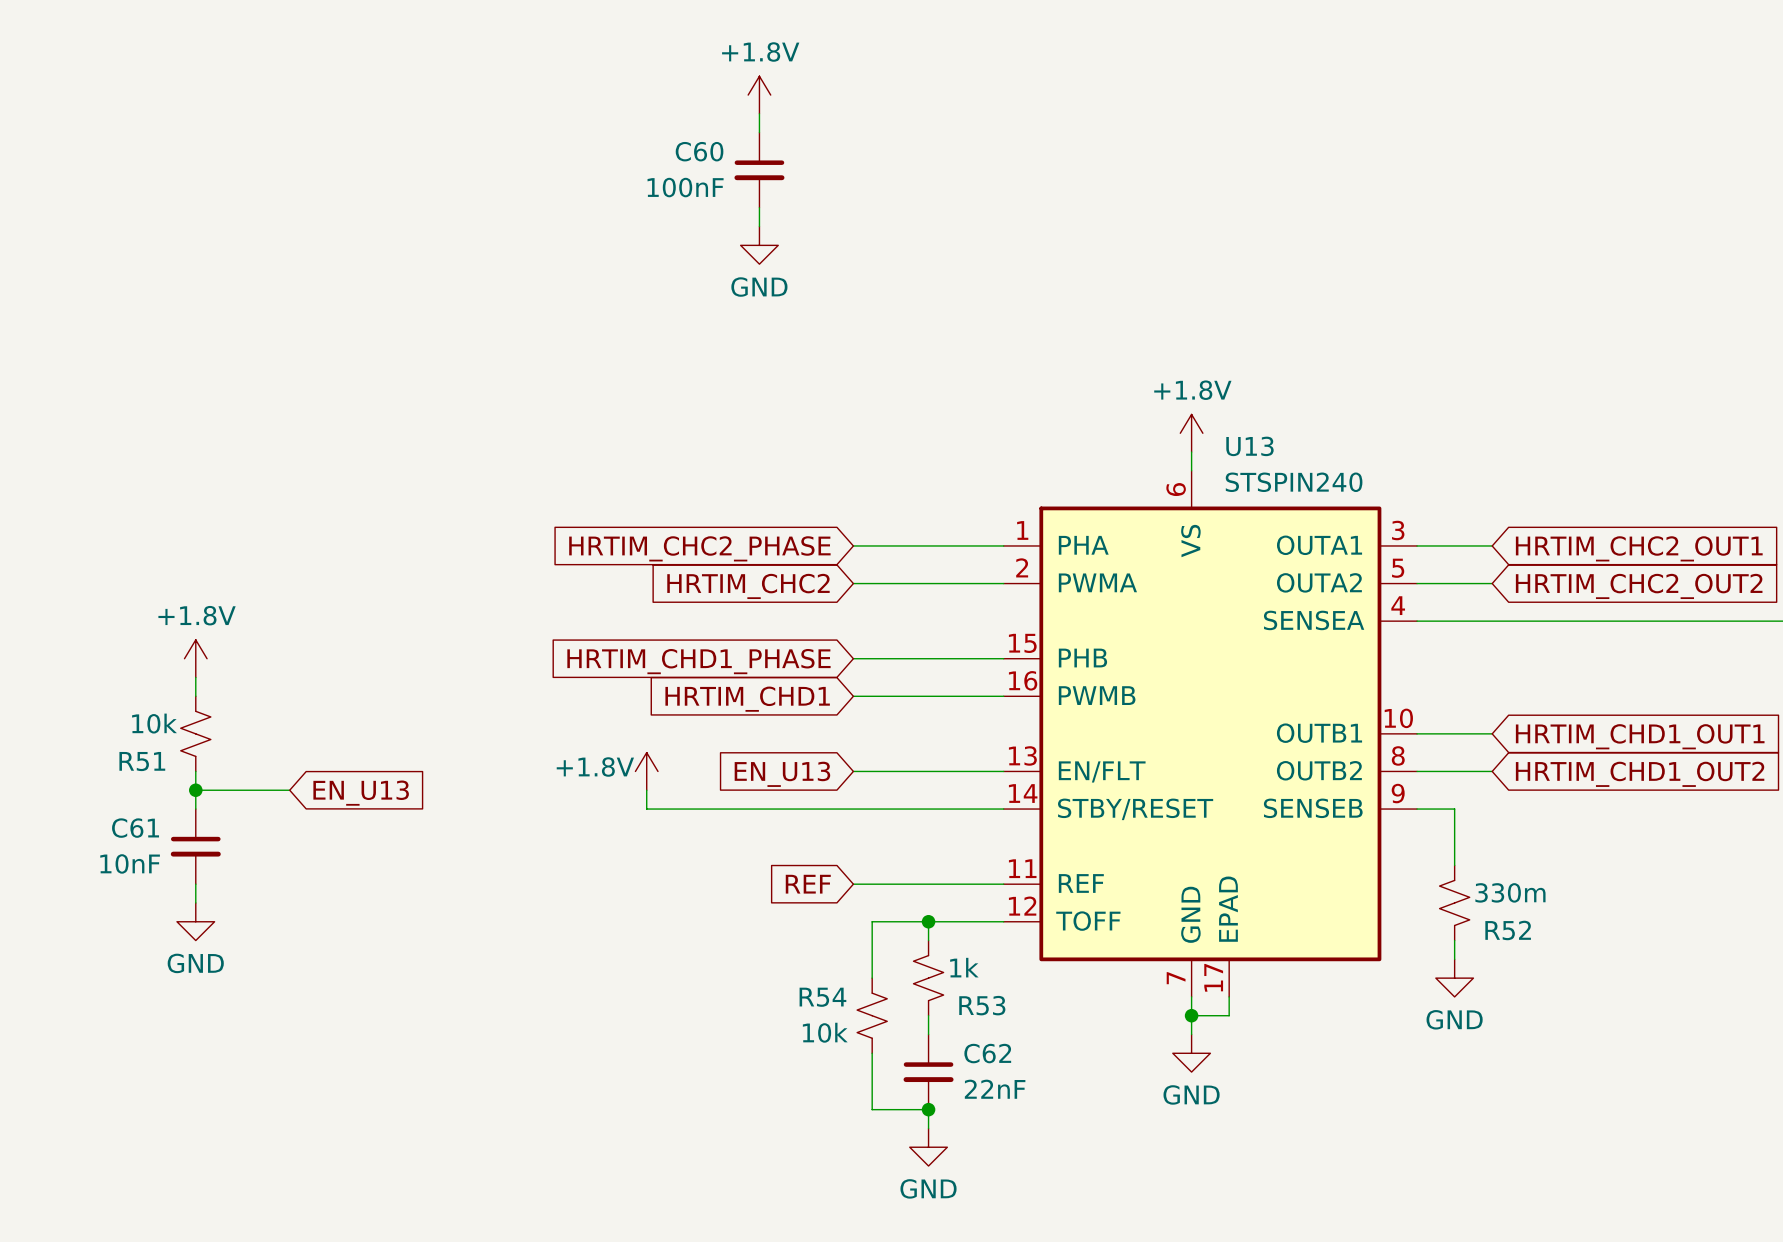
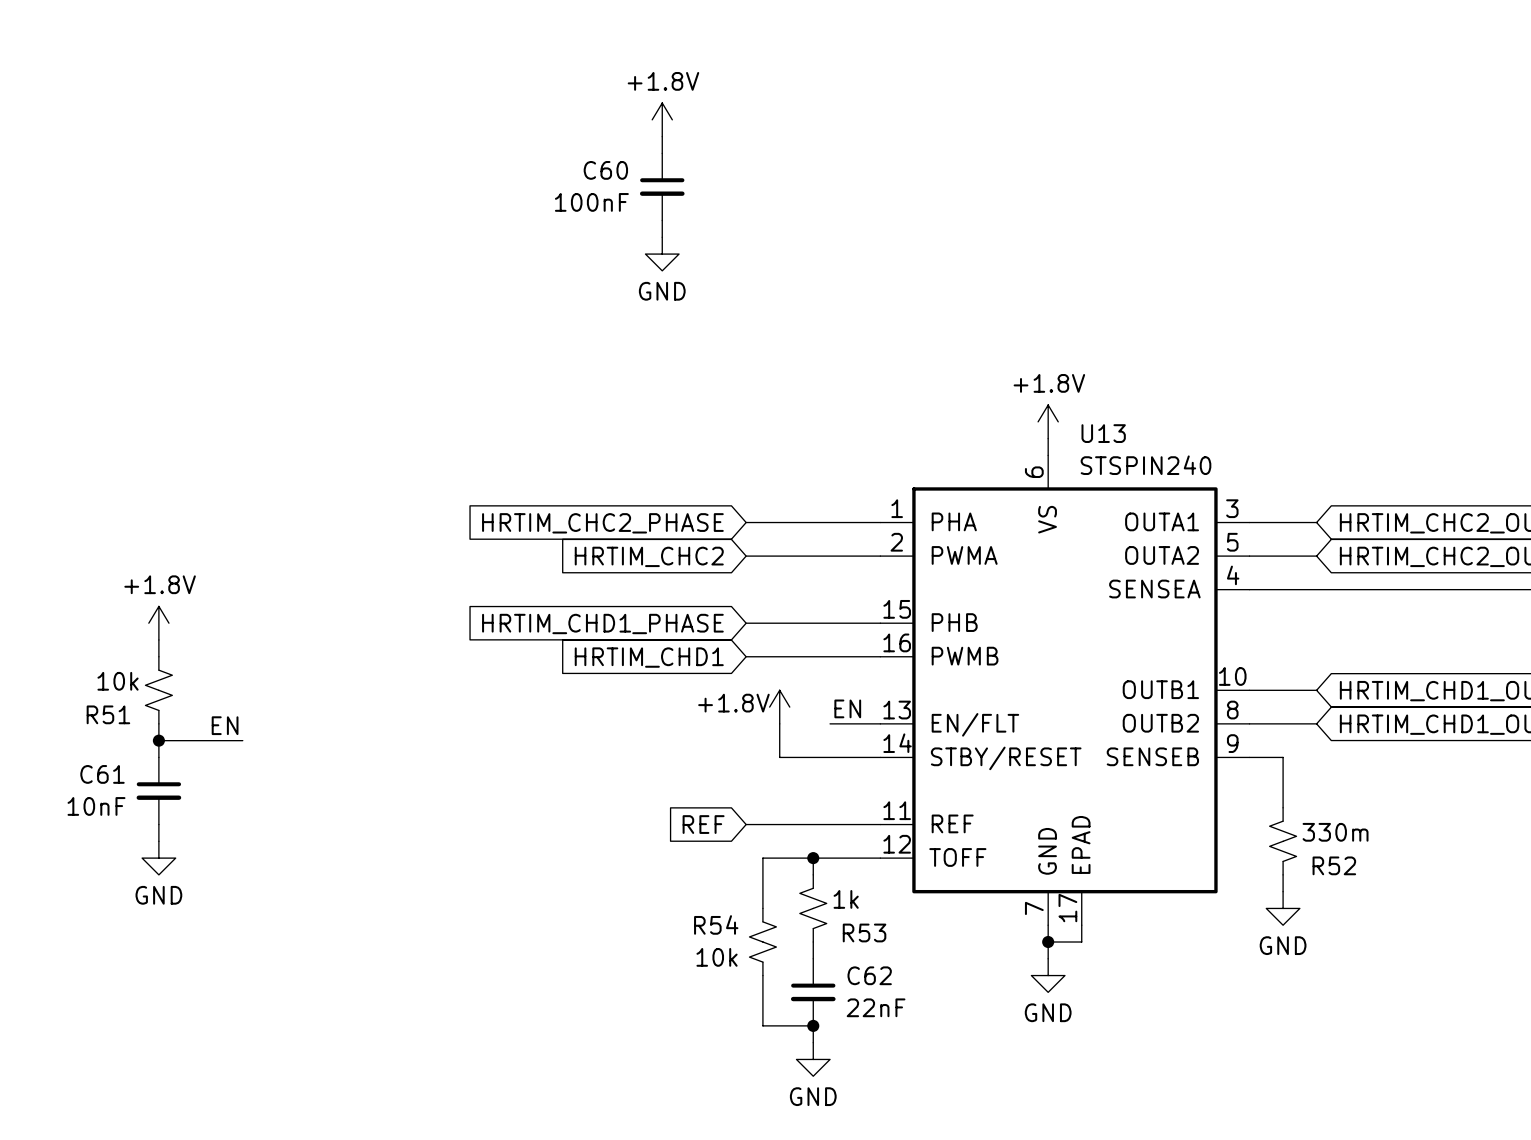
label: none -> EN (847, 708)
power symbol position: +1.8V (646, 771) -> +1.8V (779, 707)
wire: (853, 771) (947, 771) -> none
label: none -> EN (225, 725)
global label: EN_U13 (782, 774) -> none
wire: (646, 790) (646, 809) (890, 809) -> (779, 723) (779, 757)
global label: EN_U13 (361, 793) -> none

